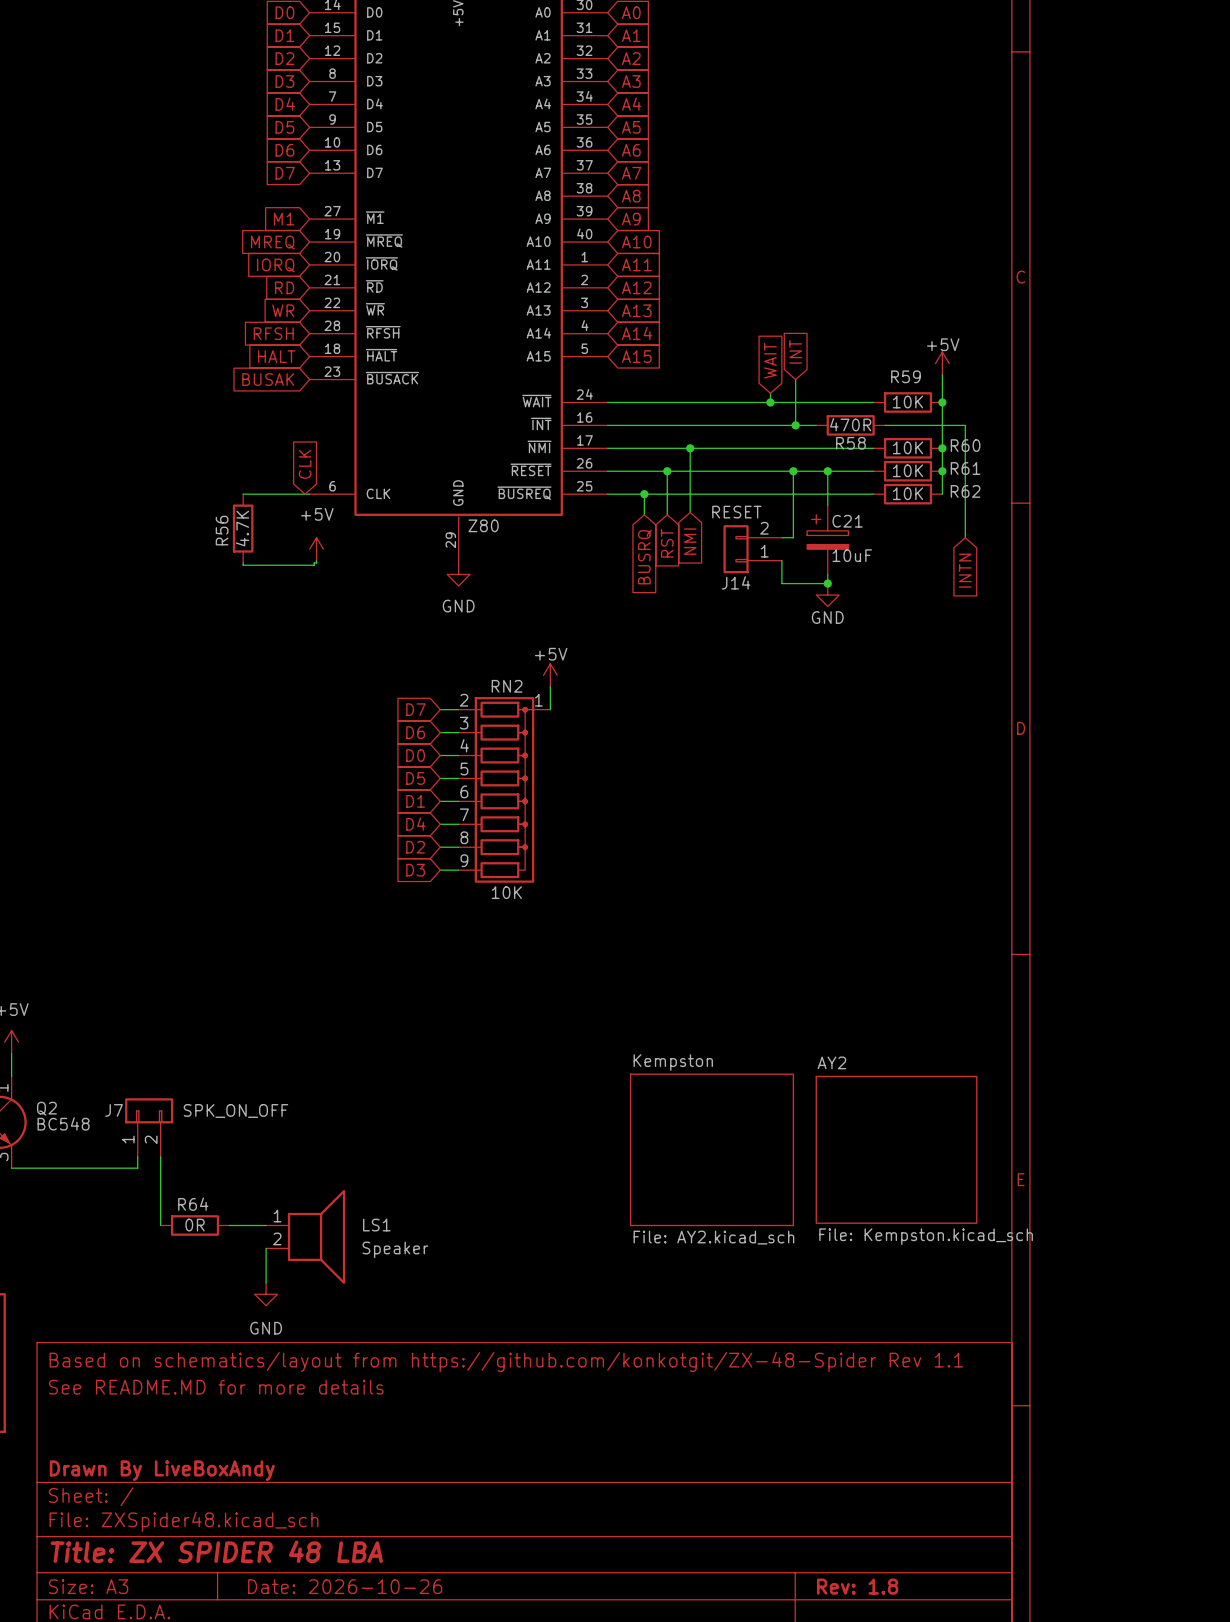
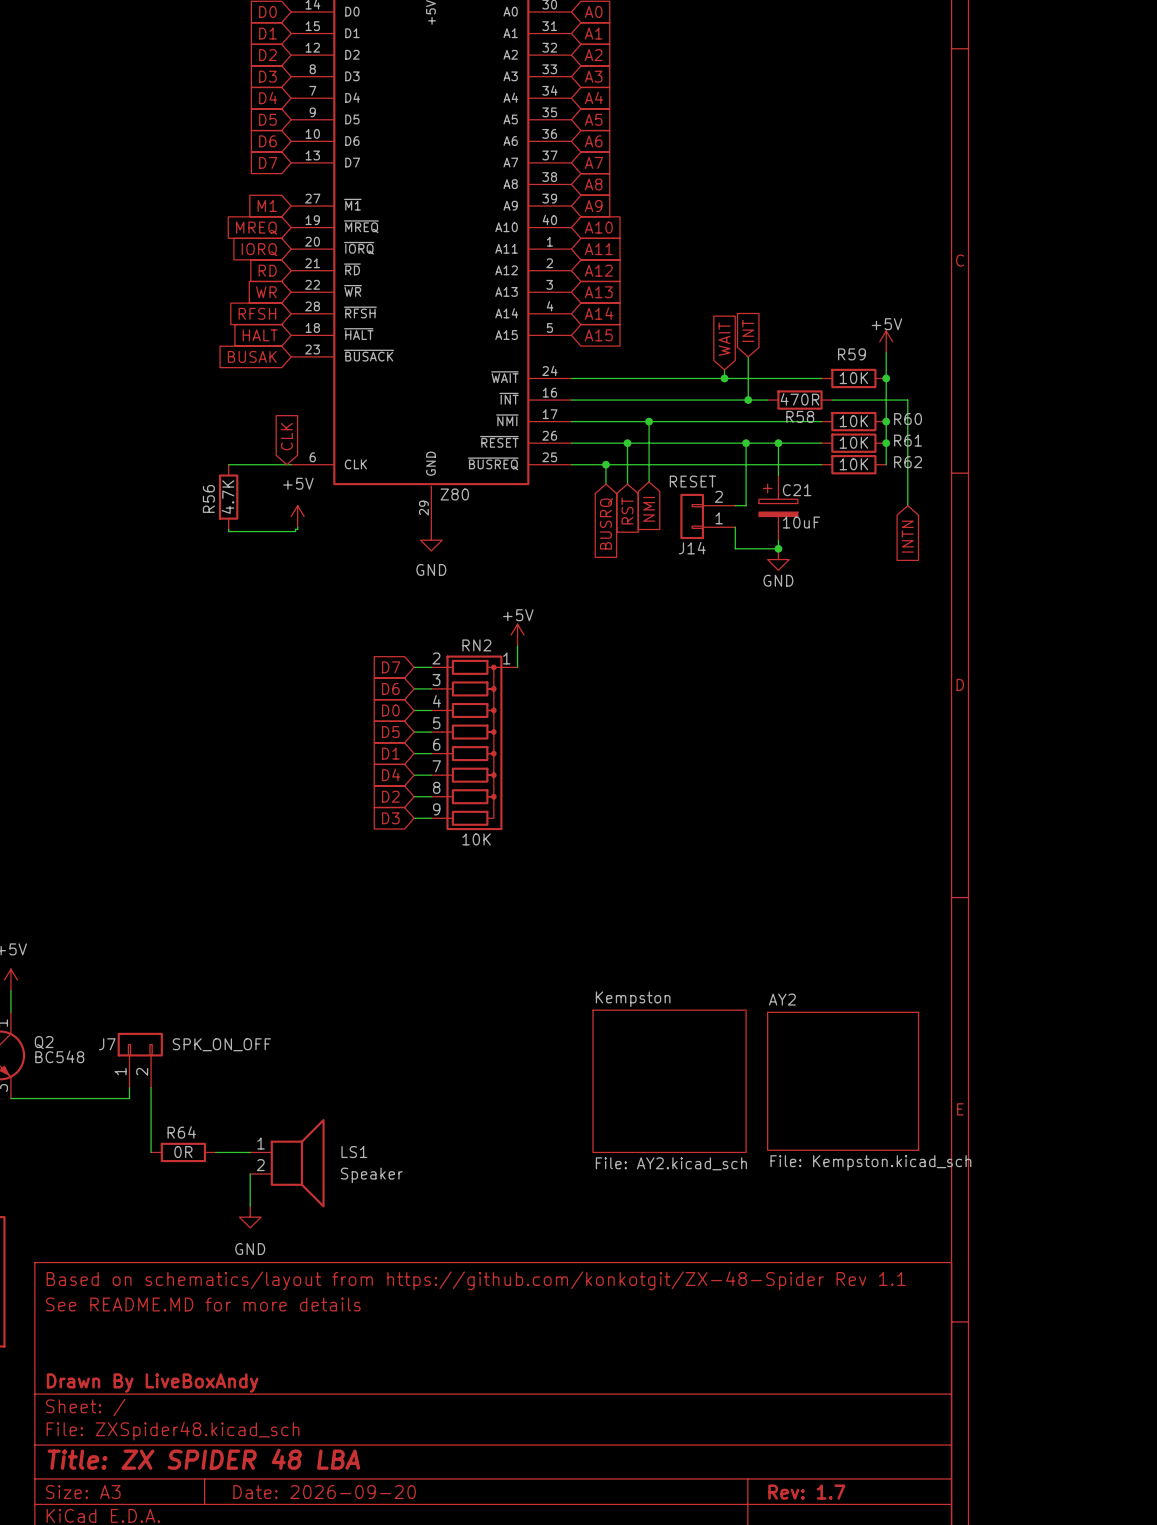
title block: Date: 2026-10-26 (345, 1586) -> Date: 2026-09-20 (324, 1492)
title block: Rev: 1.8 (857, 1586) -> Rev: 1.7 (806, 1492)

